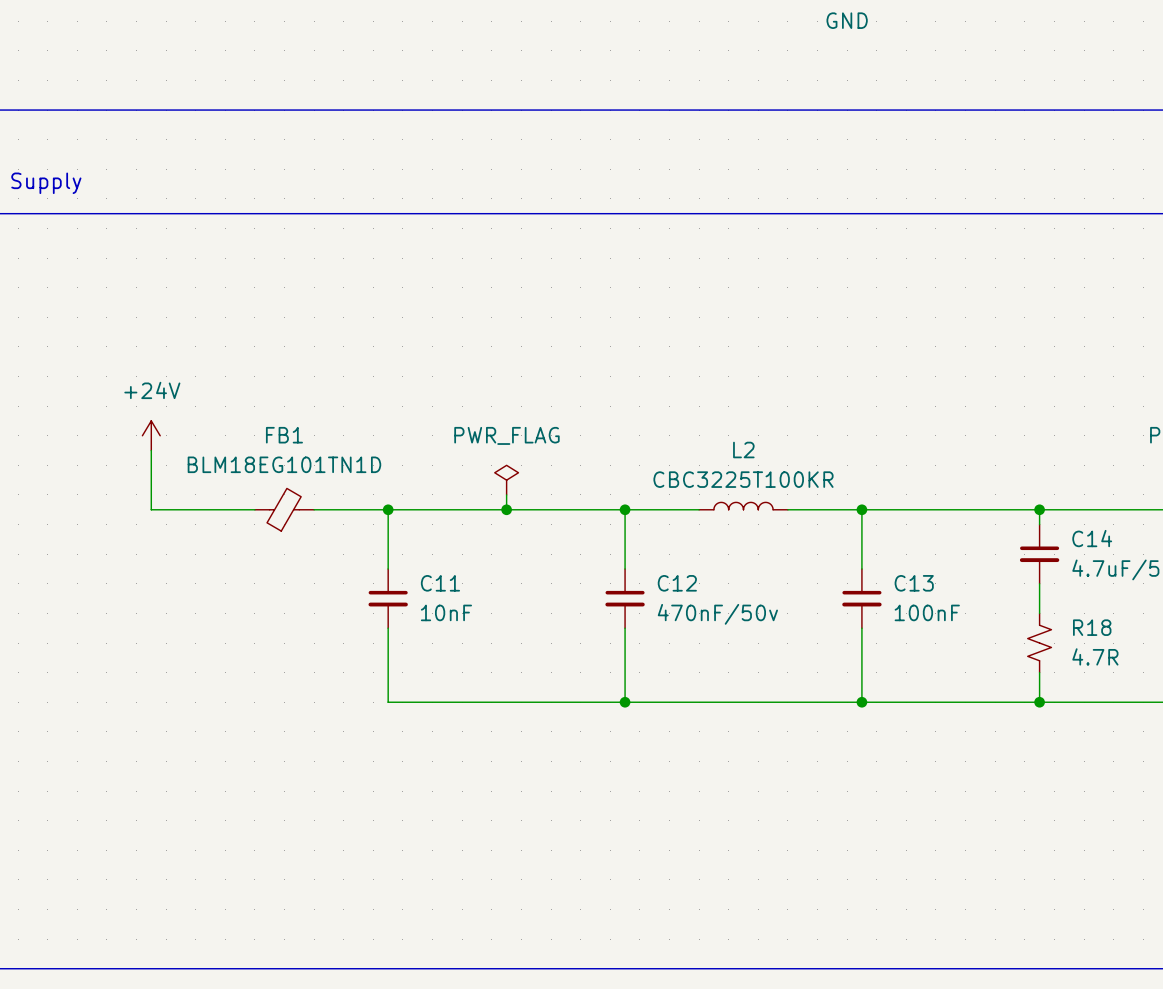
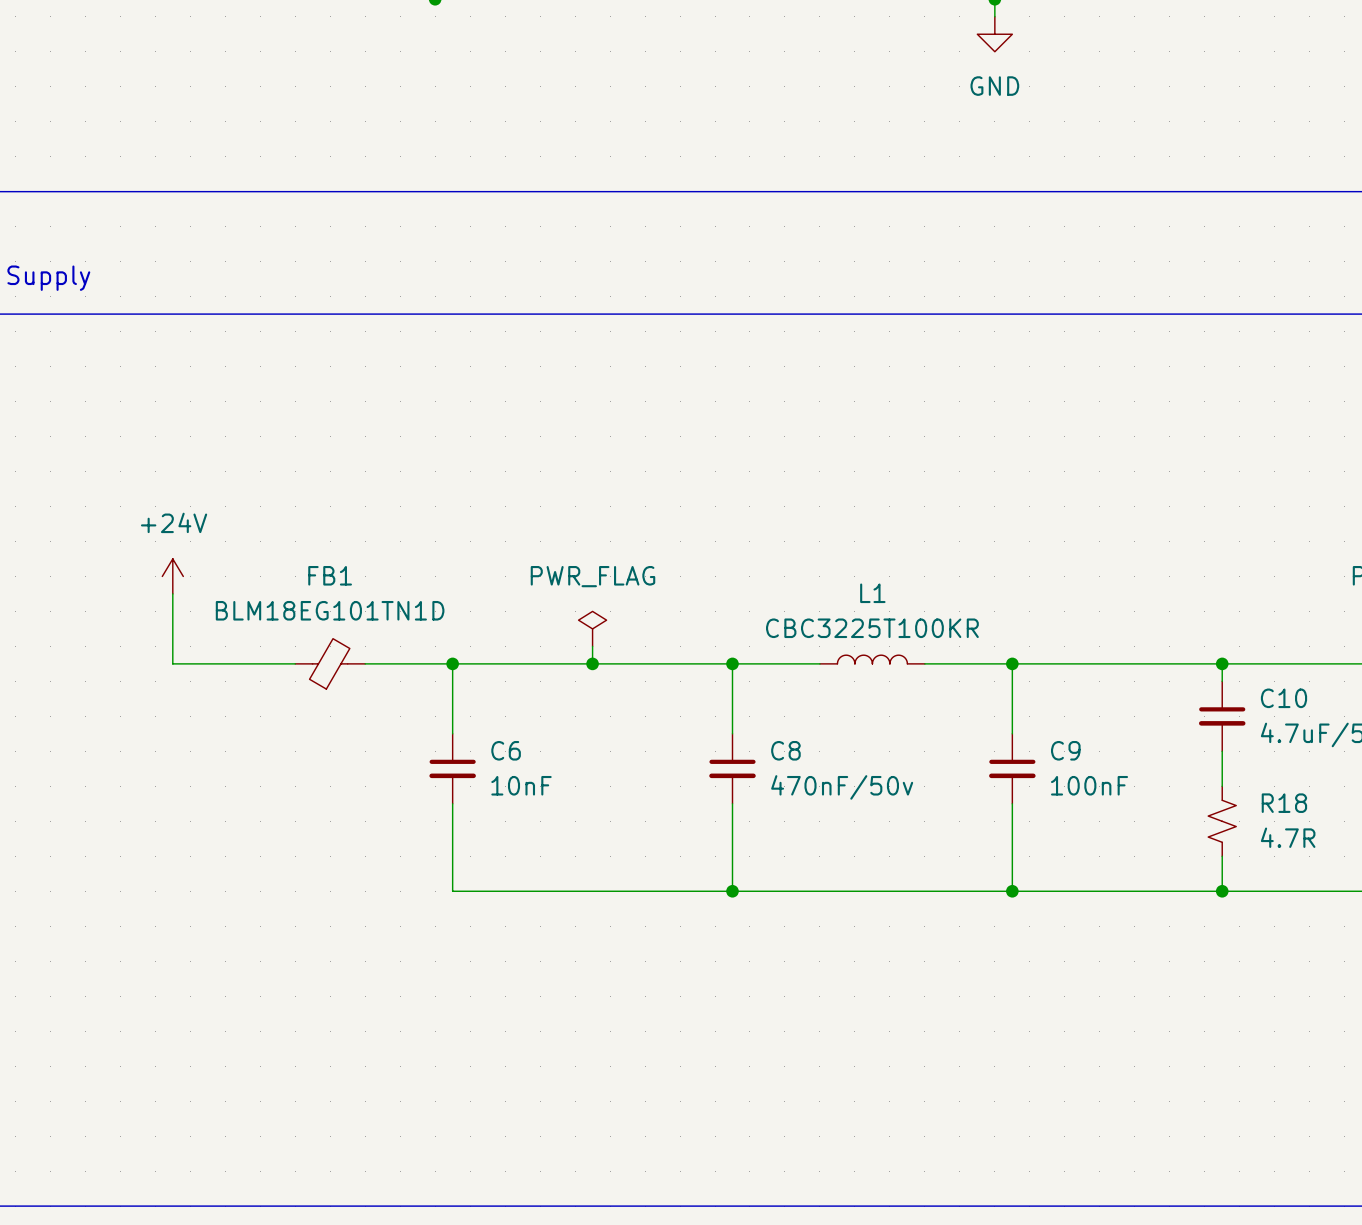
L2 name: L2 (743, 450) -> L1 (872, 593)
C14 name: C14 (1092, 538) -> C10 (1283, 698)
C11 name: C11 (440, 583) -> C6 (506, 750)
C12 name: C12 (677, 583) -> C8 (785, 750)
C13 name: C13 (914, 583) -> C9 (1065, 750)

